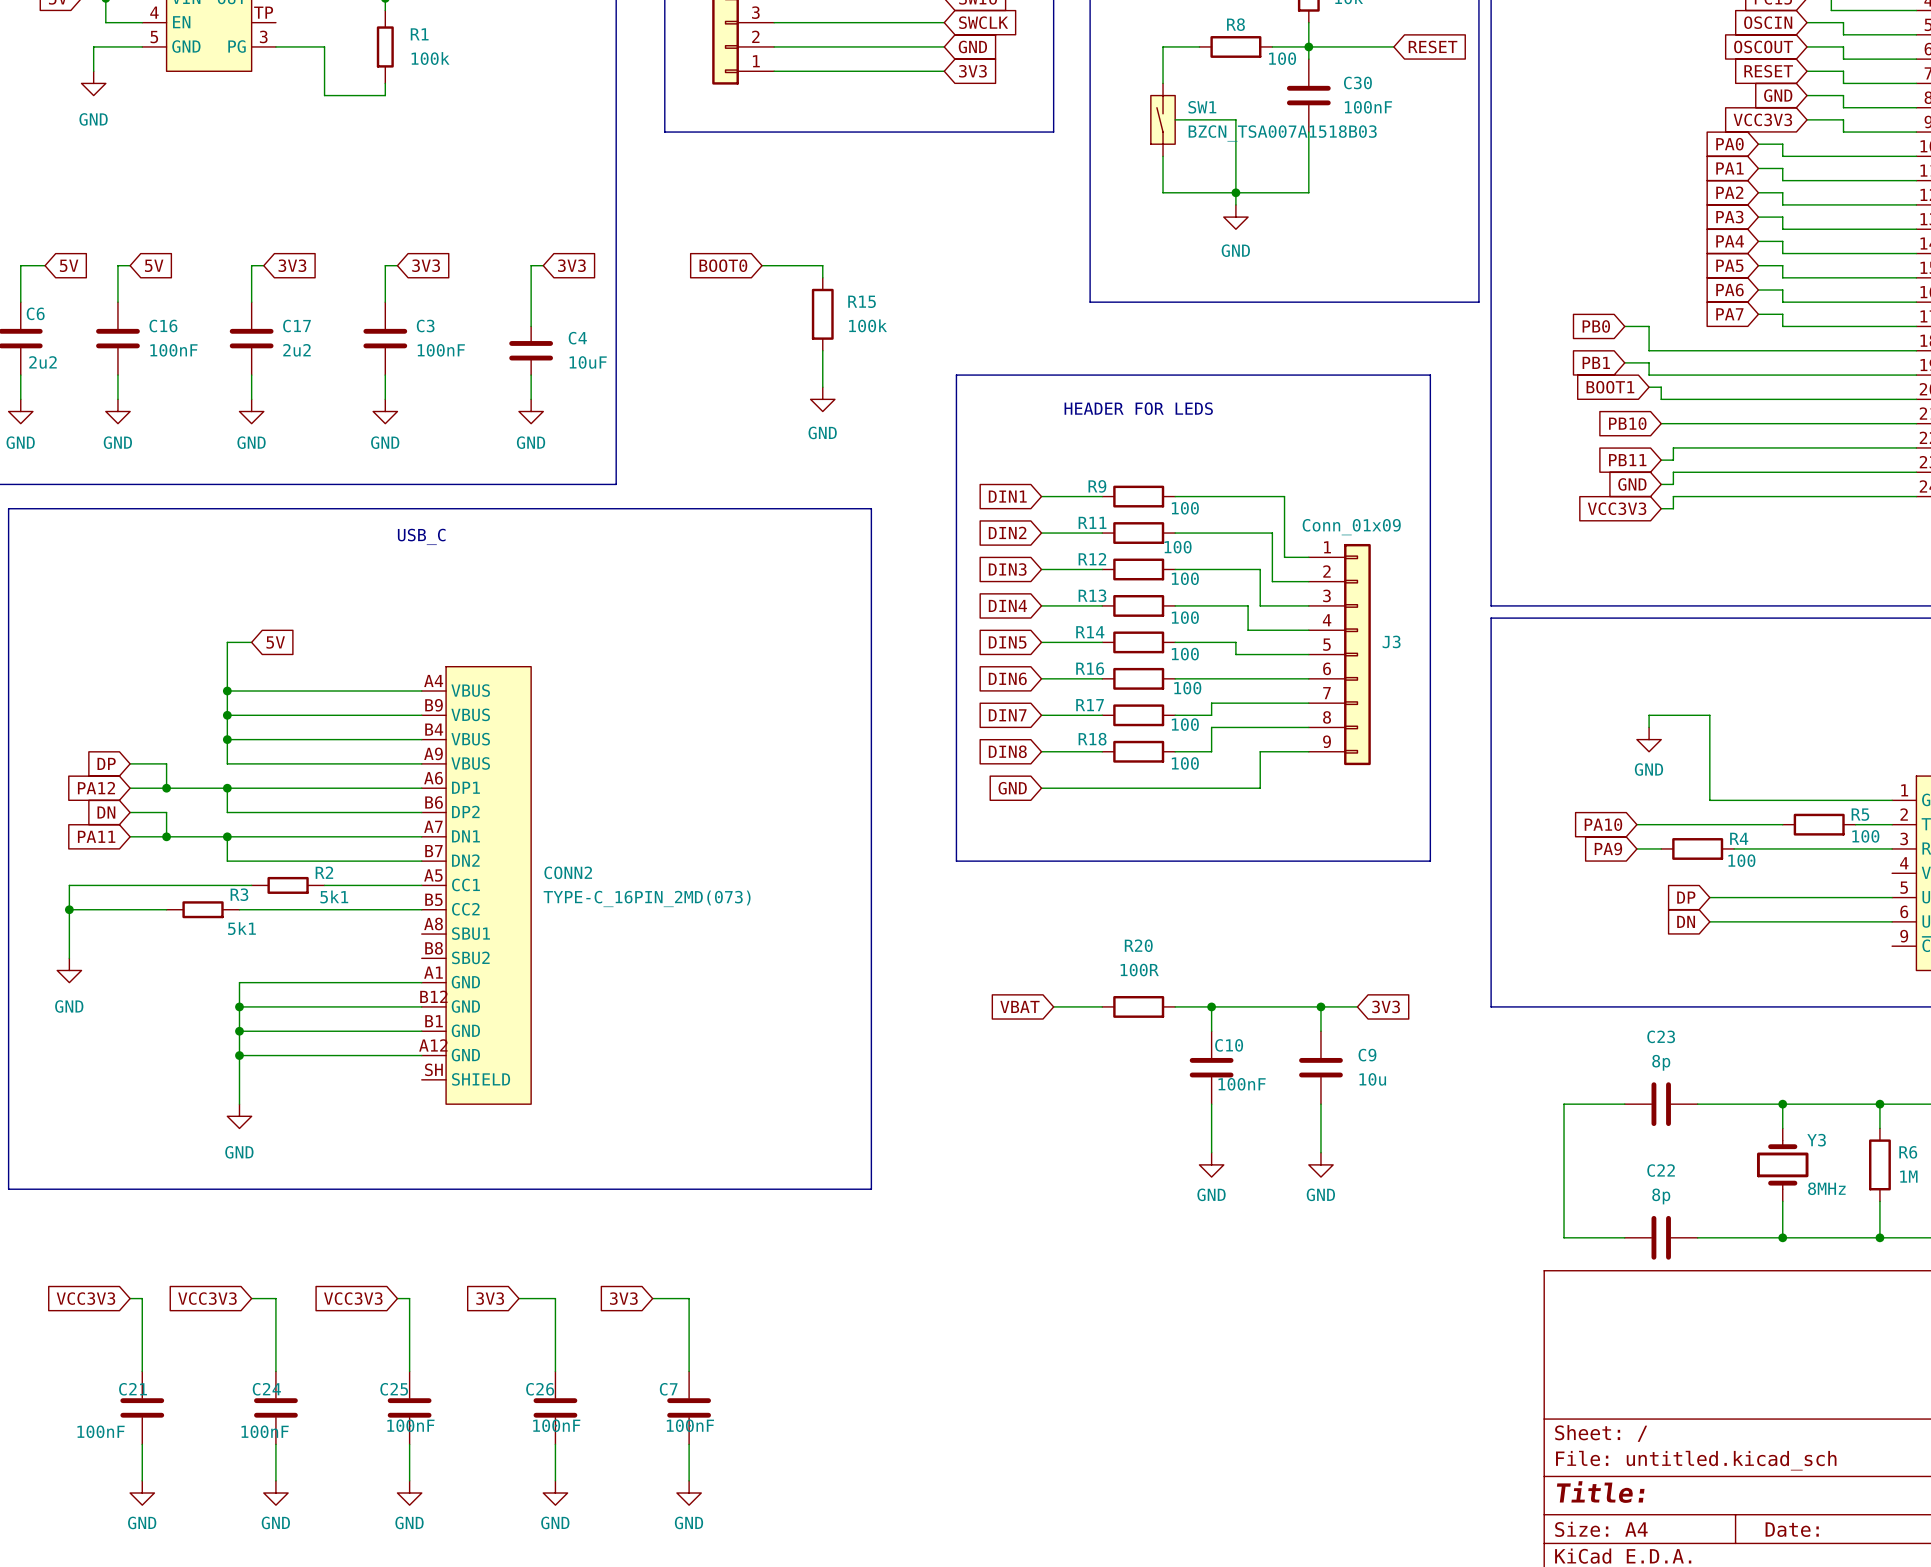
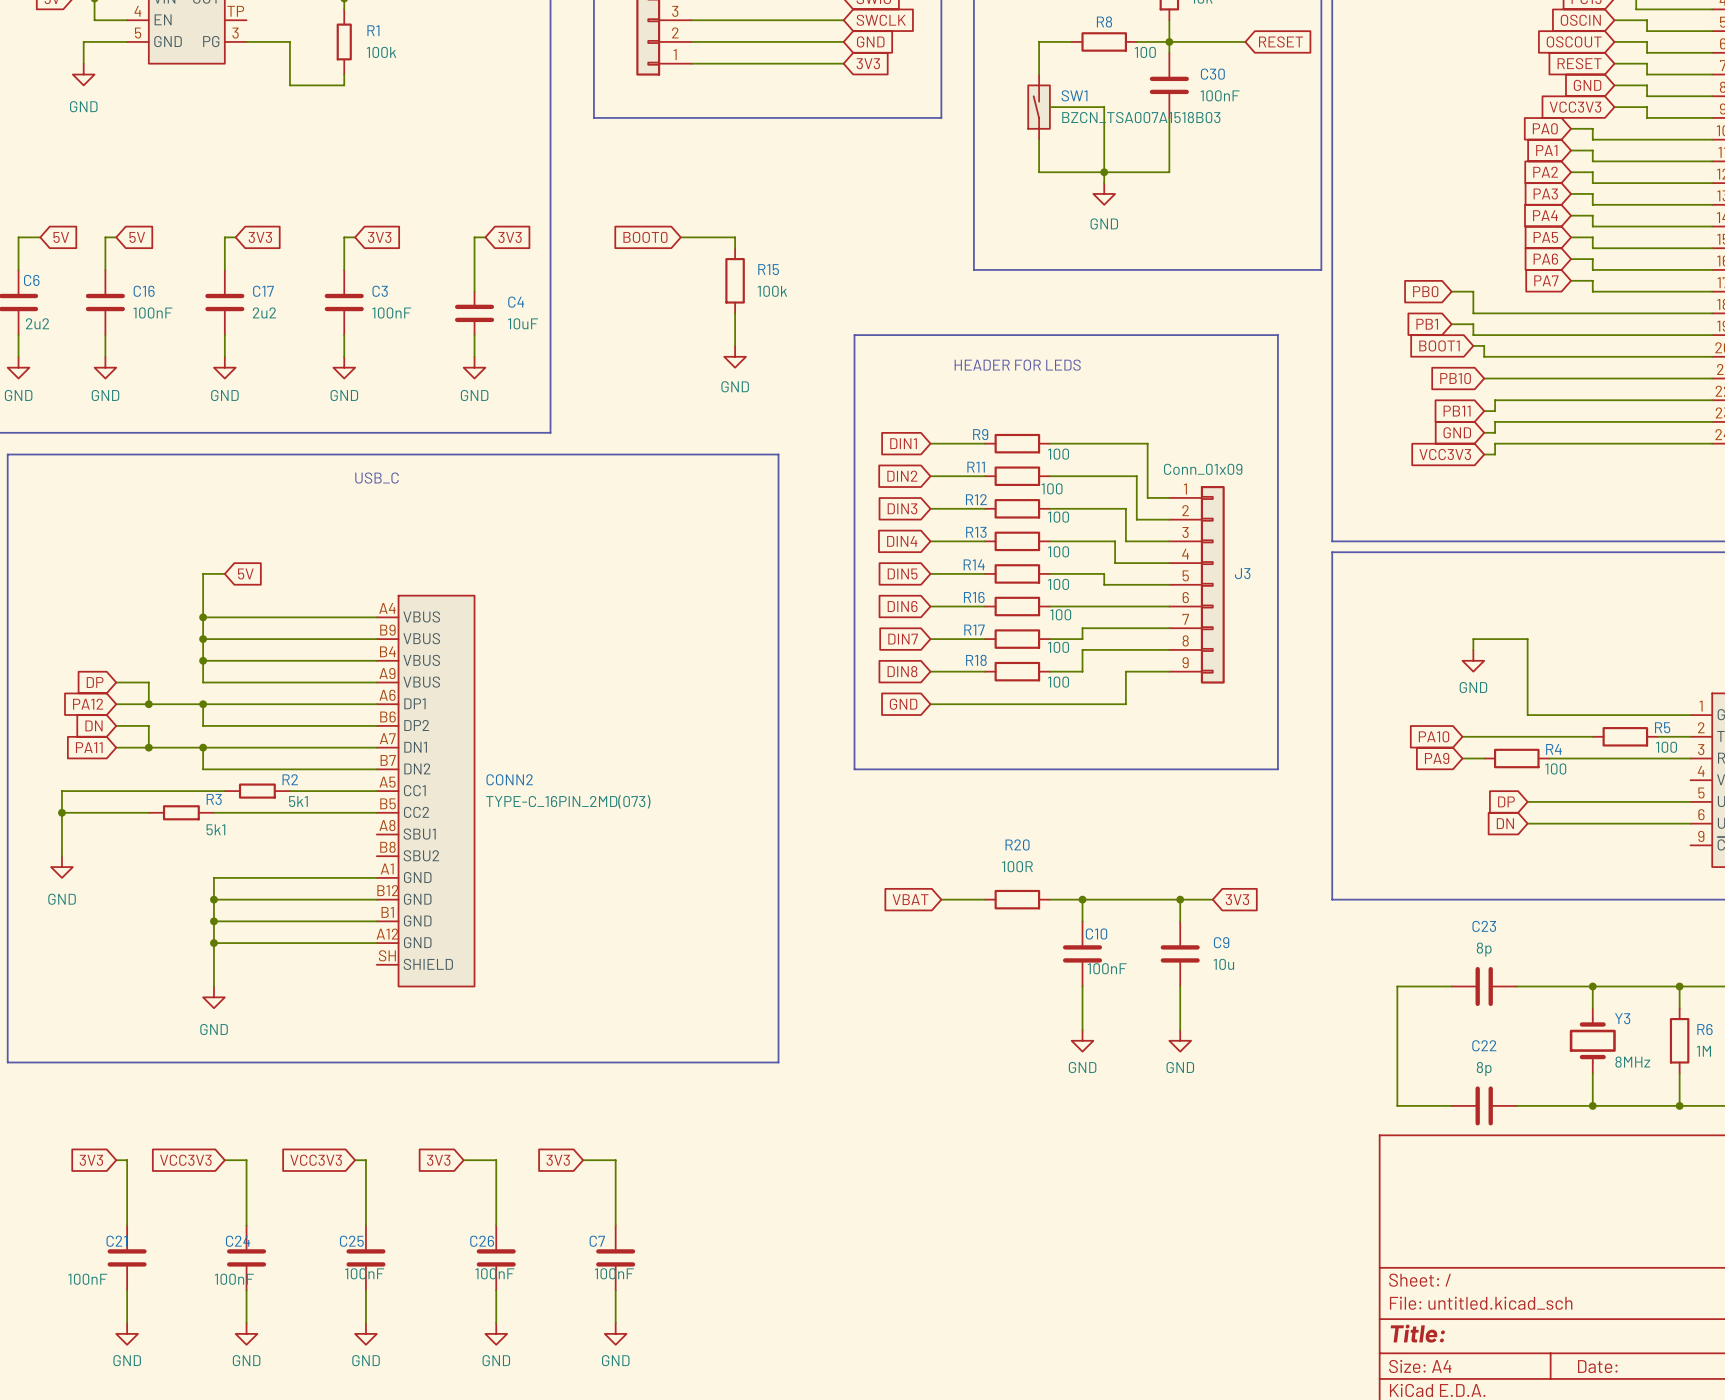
global label: VCC3V3 (85, 1298) -> 3V3 (91, 1160)

